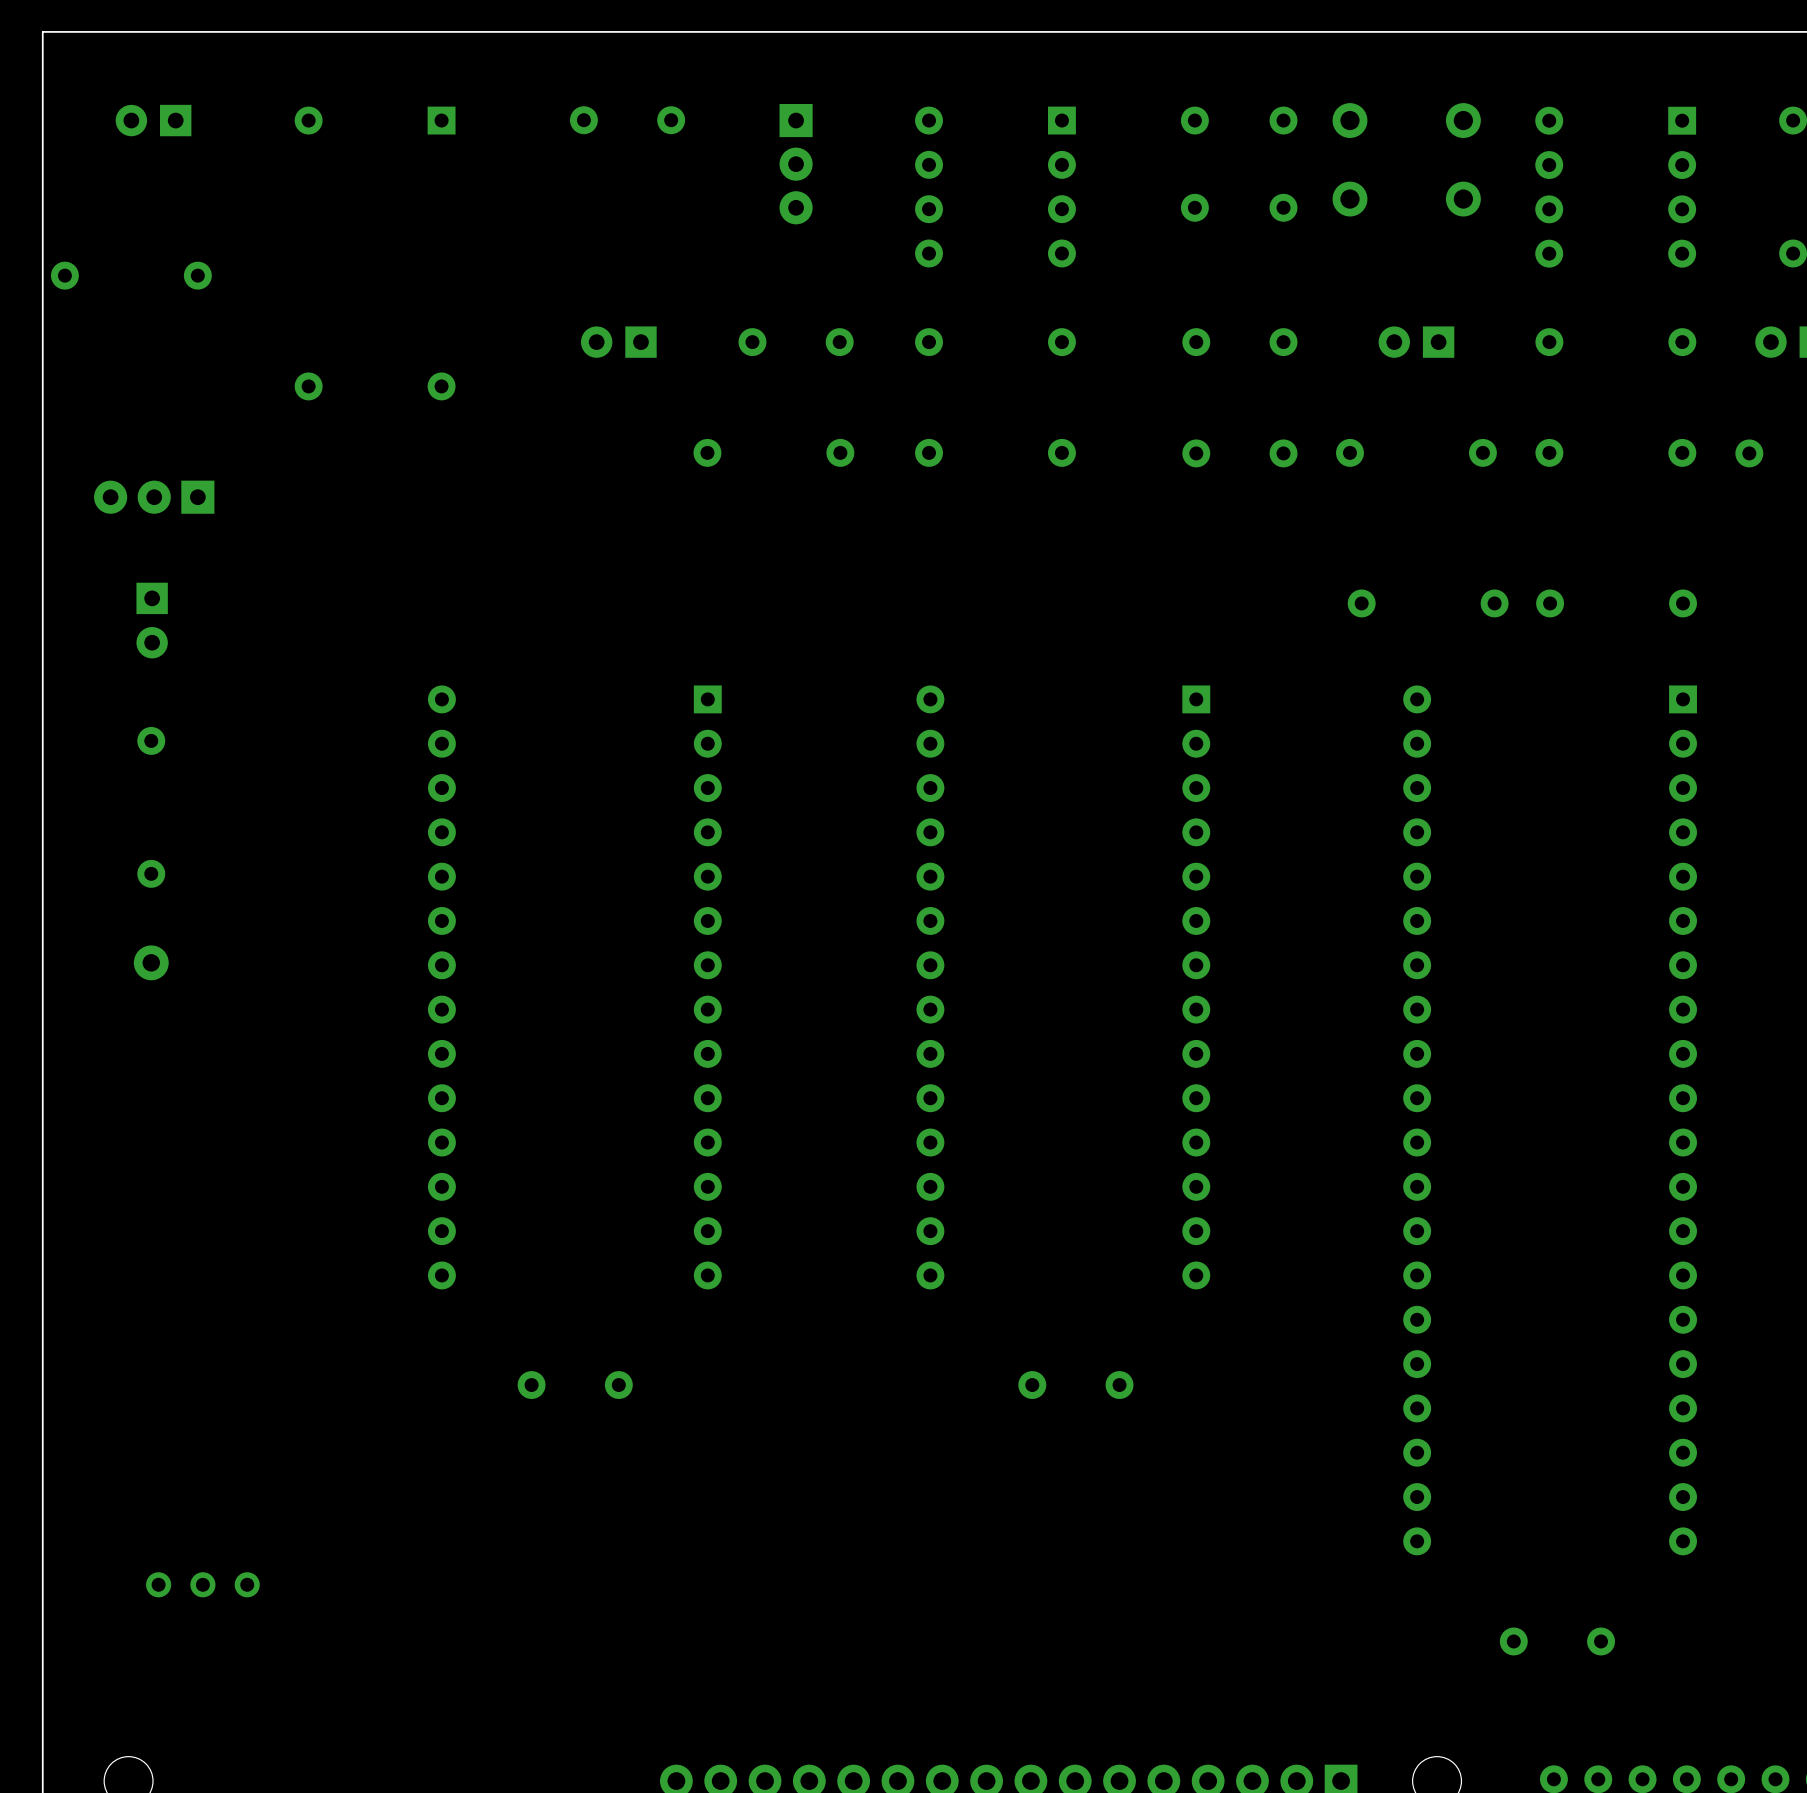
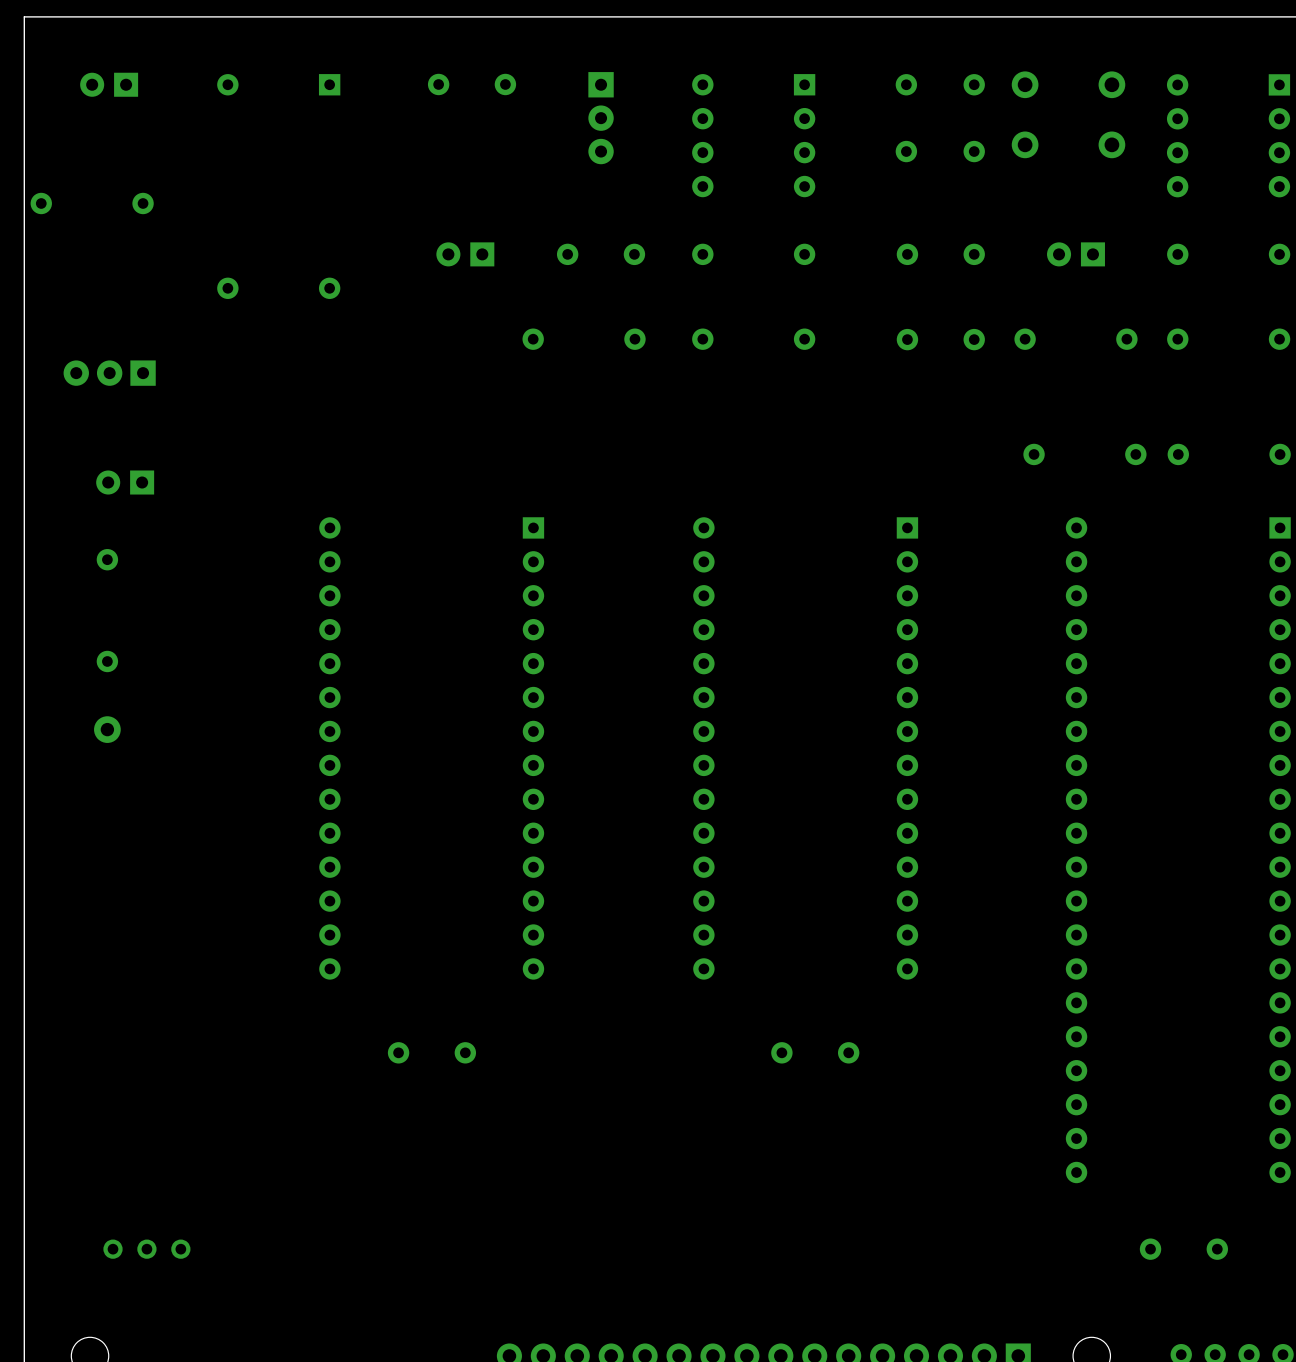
part rotation: 0° (152, 620) -> 90° clockwise (125, 482)
part position: (202, 1584) -> (146, 1249)

